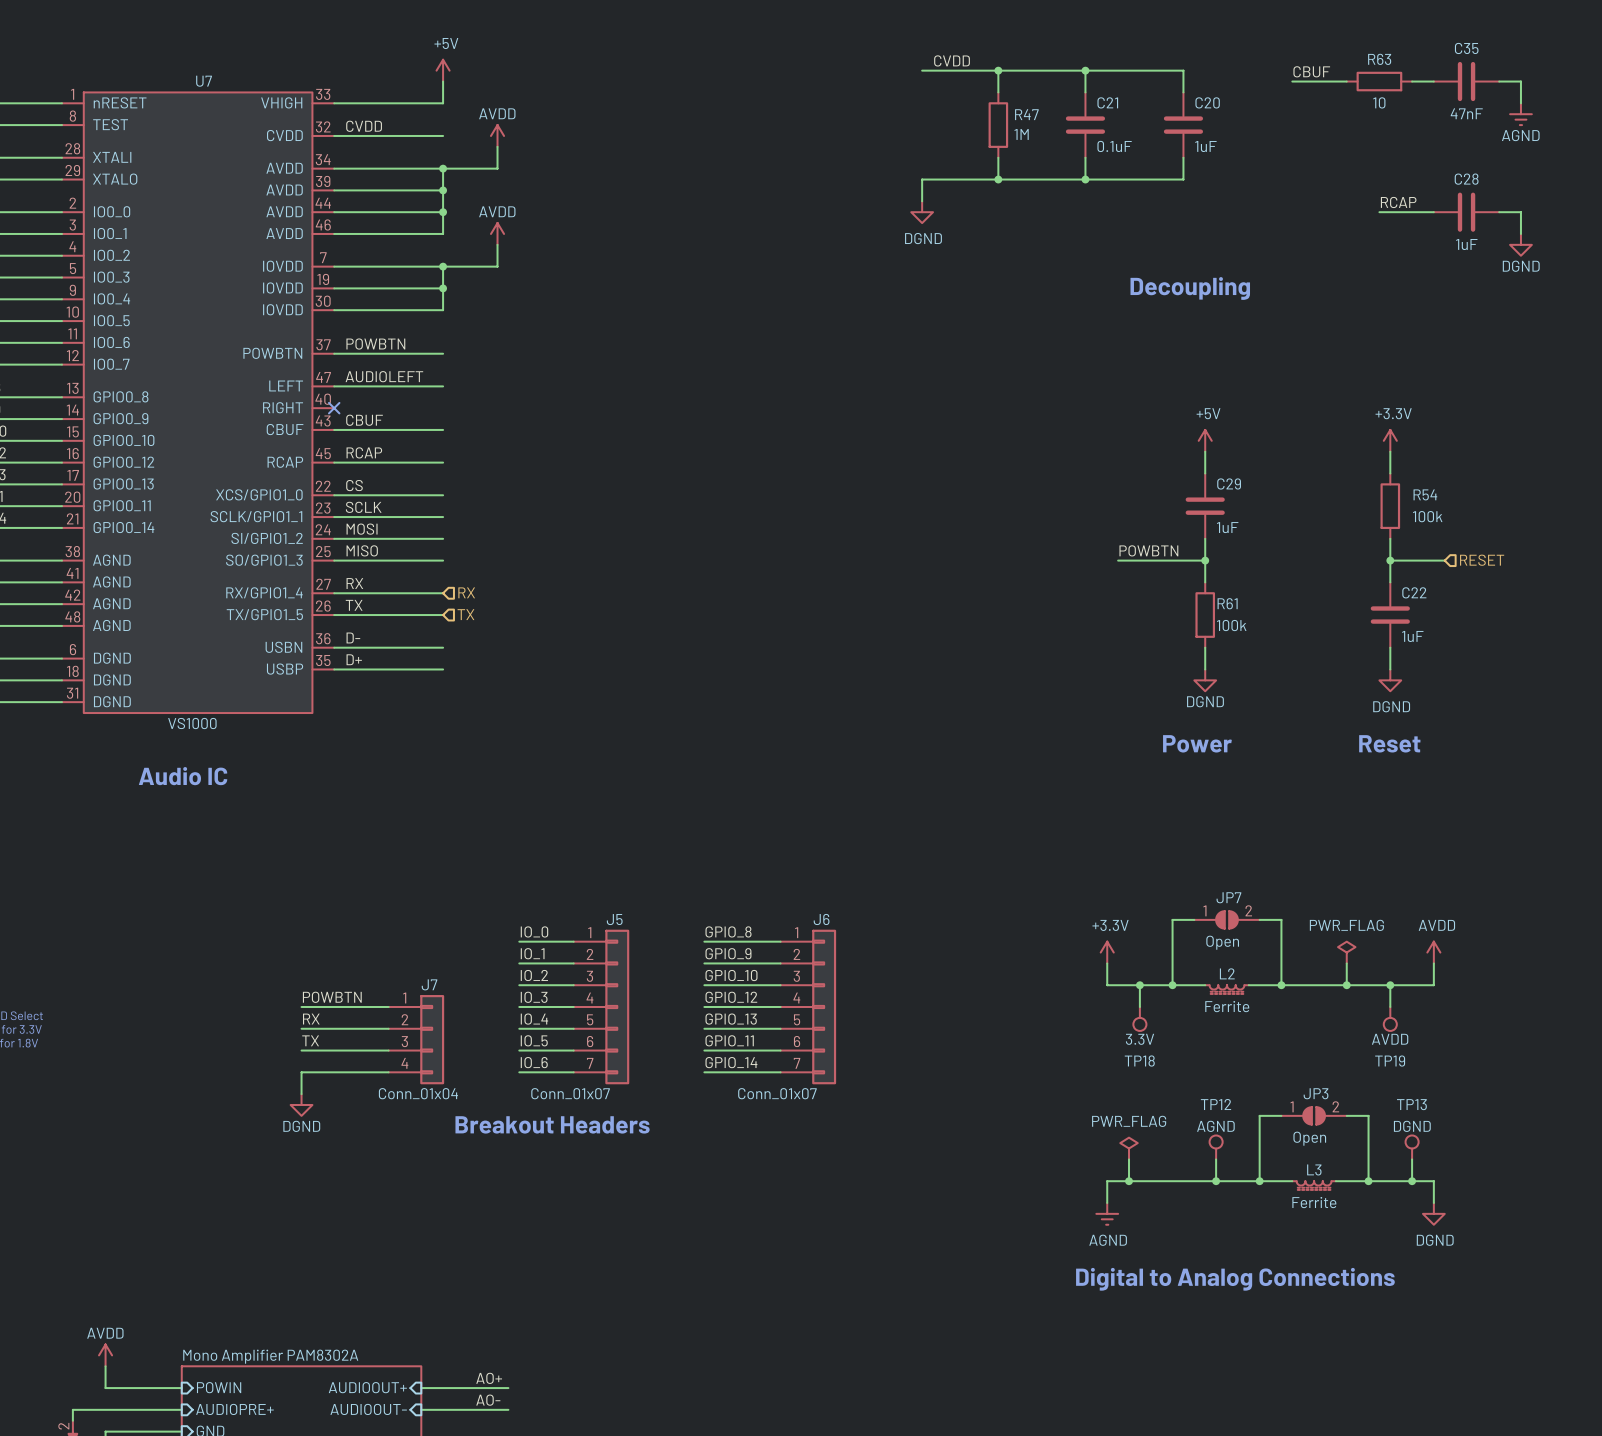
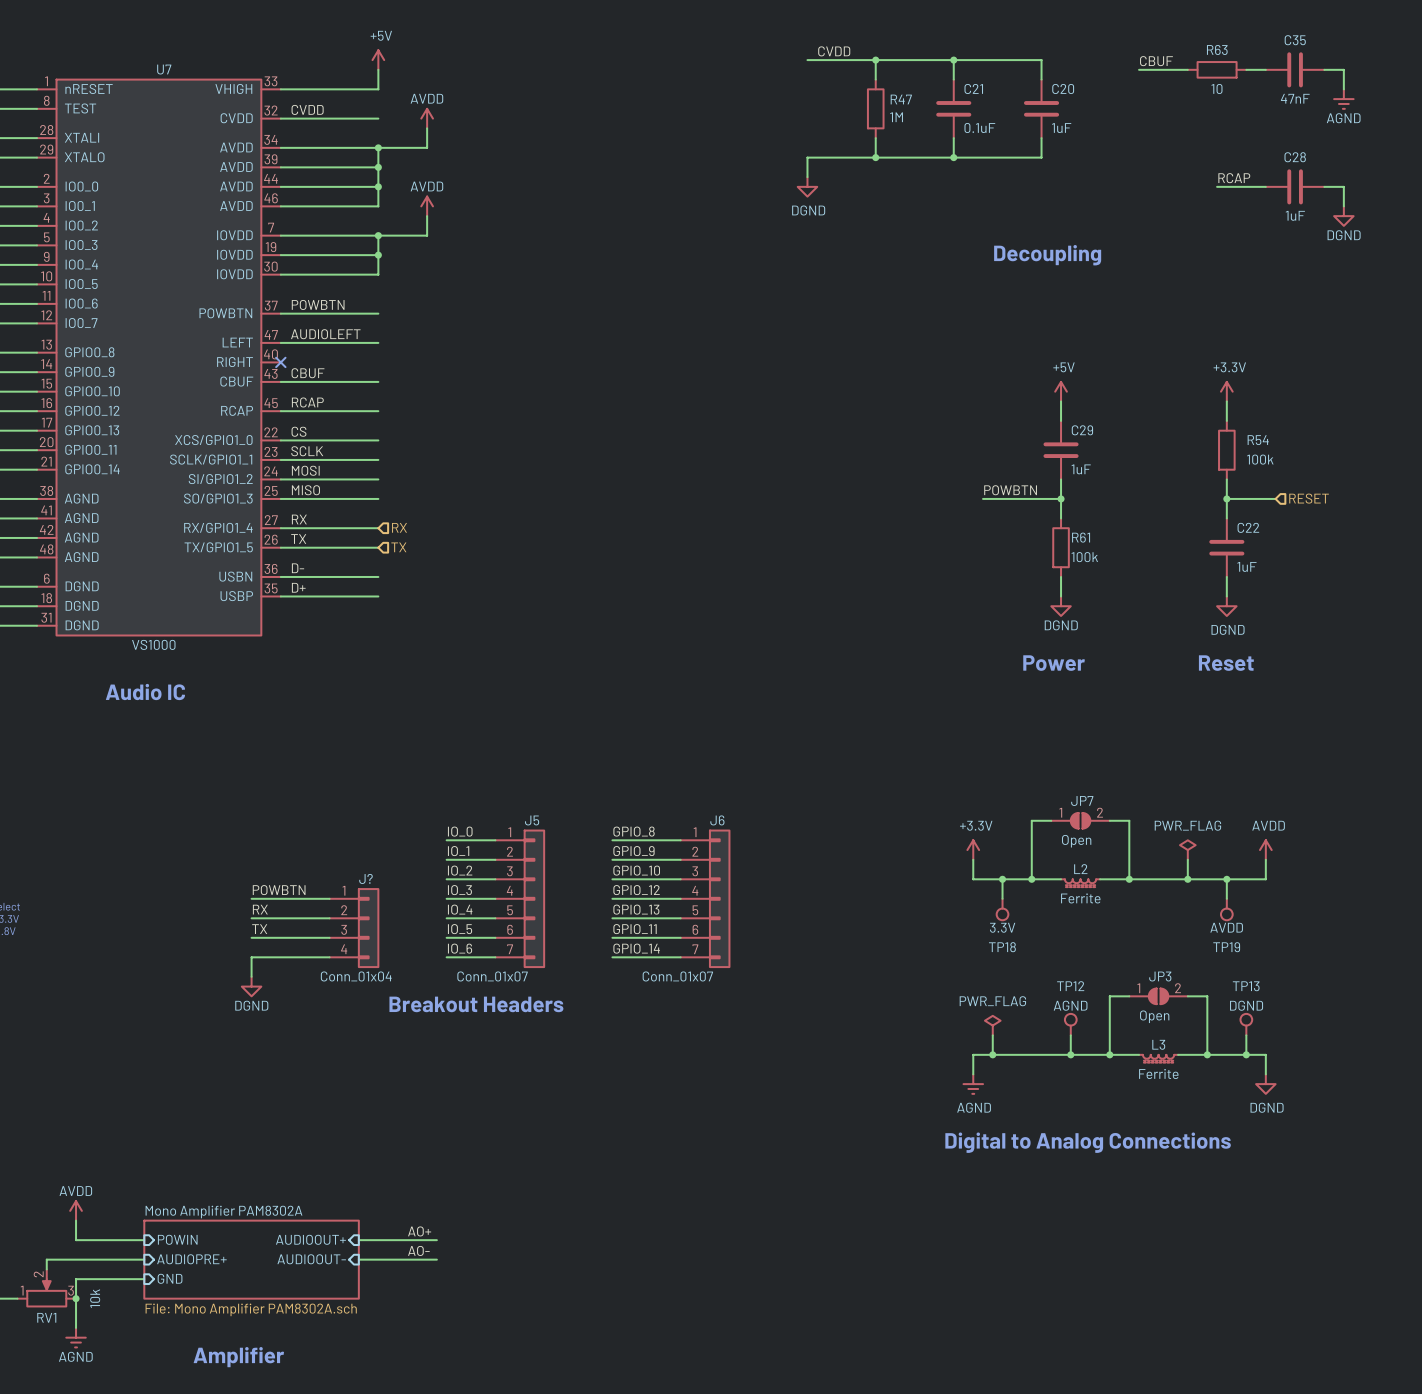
J7 name: J7 (429, 984) -> J? (365, 878)

